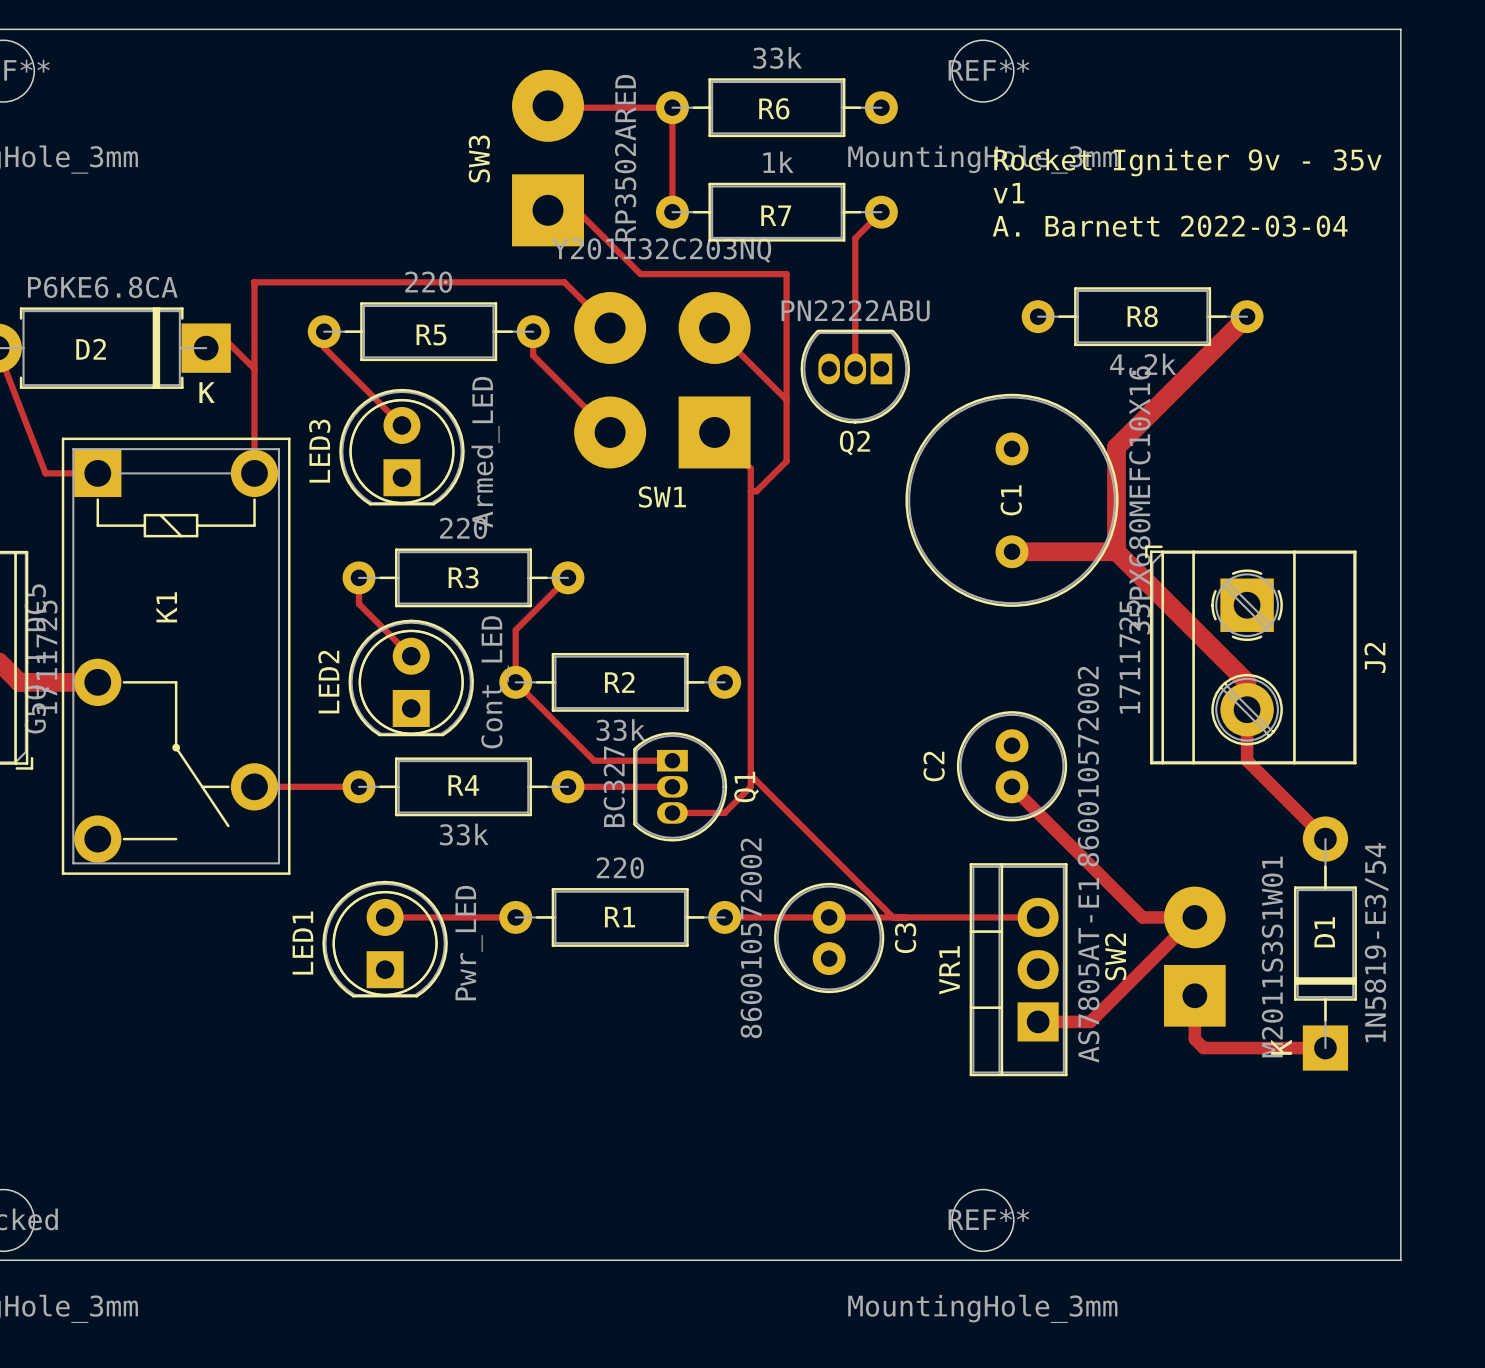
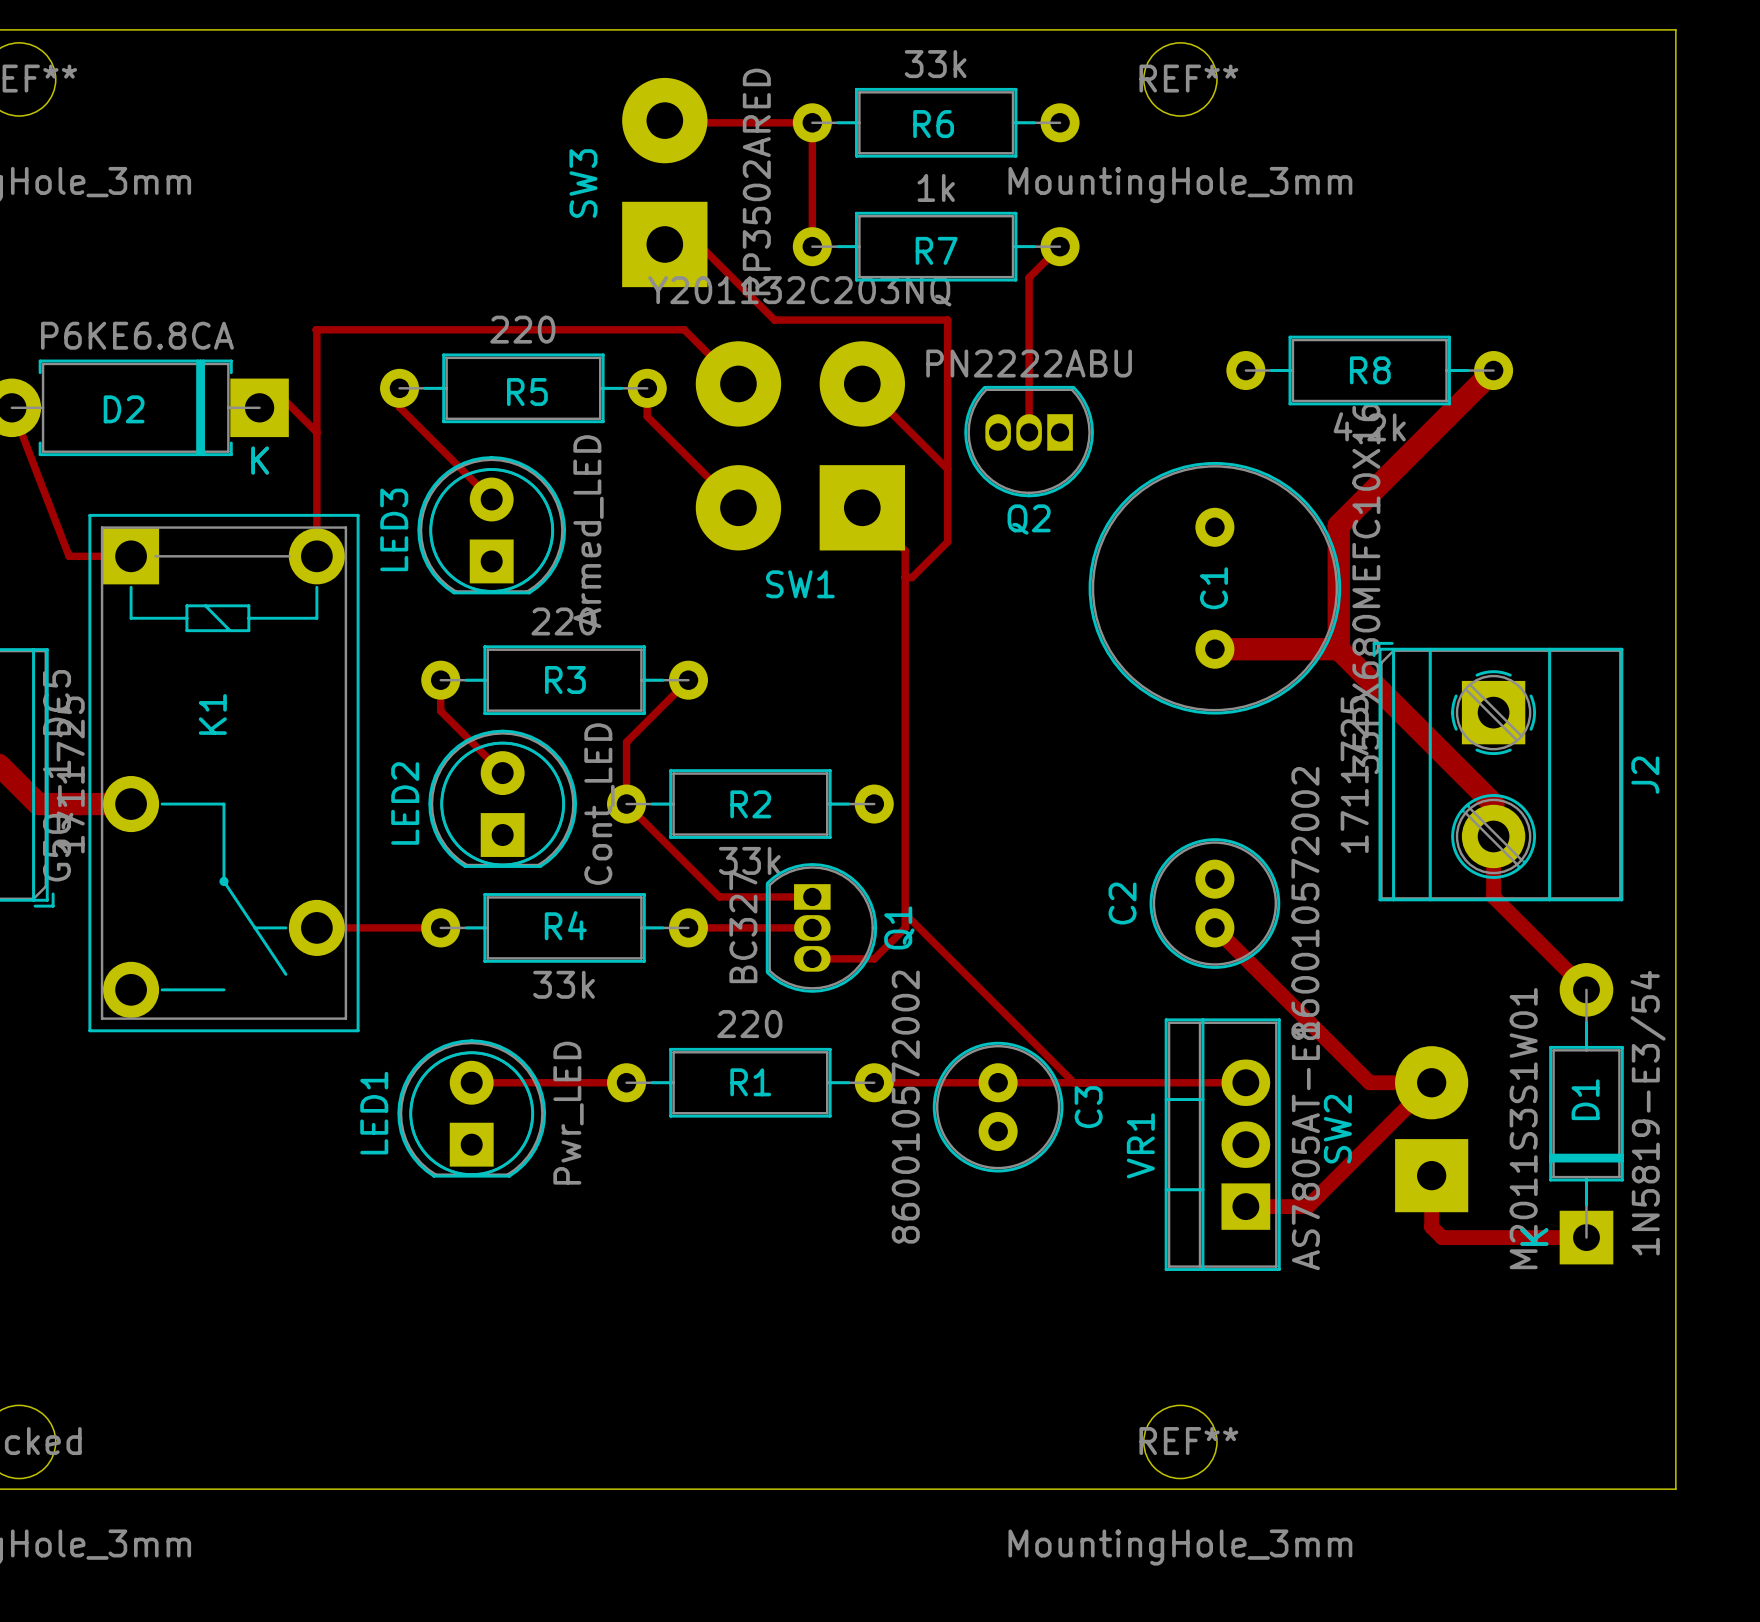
text: Rocket Igniter 9v - 35v (1187, 162) -> none
text: v1 (1008, 193) -> none
text: A. Barnett 2022-03-04 (1170, 226) -> none

